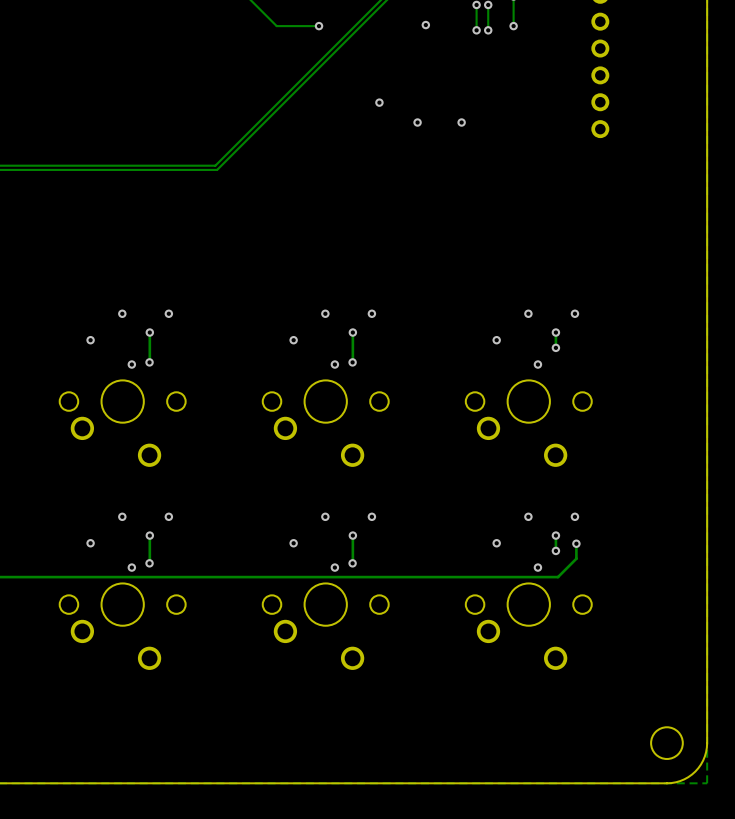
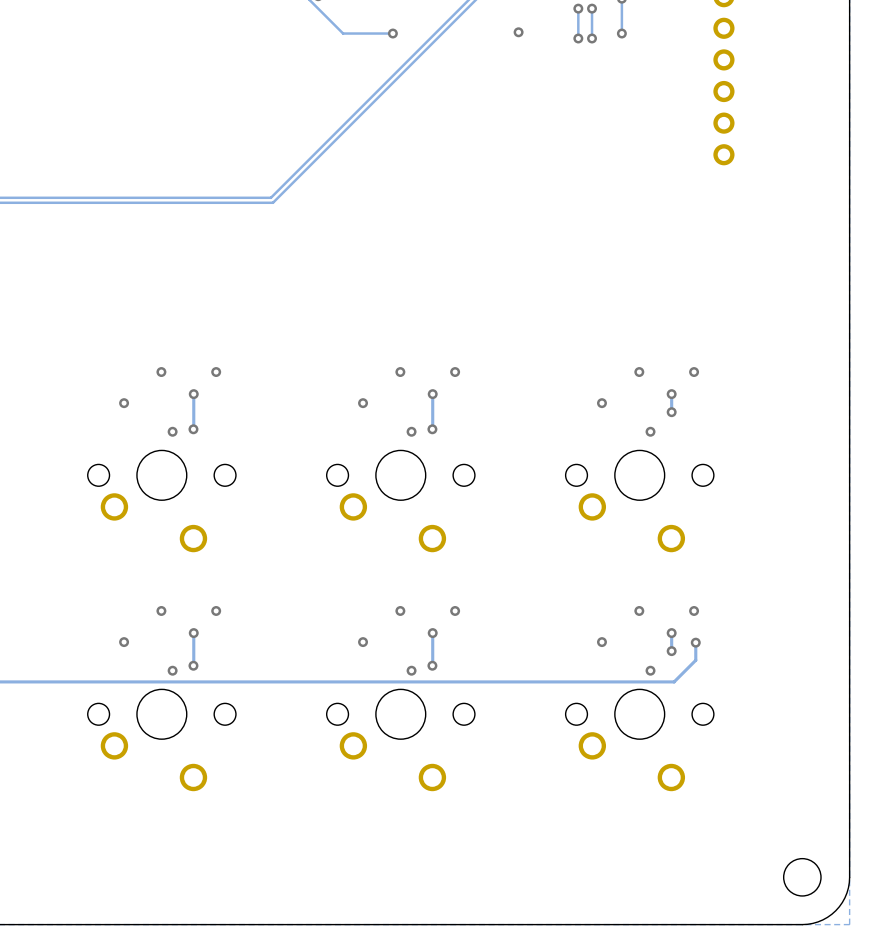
via: (379, 102) -> none
via: (417, 122) -> none
via: (461, 122) -> none

